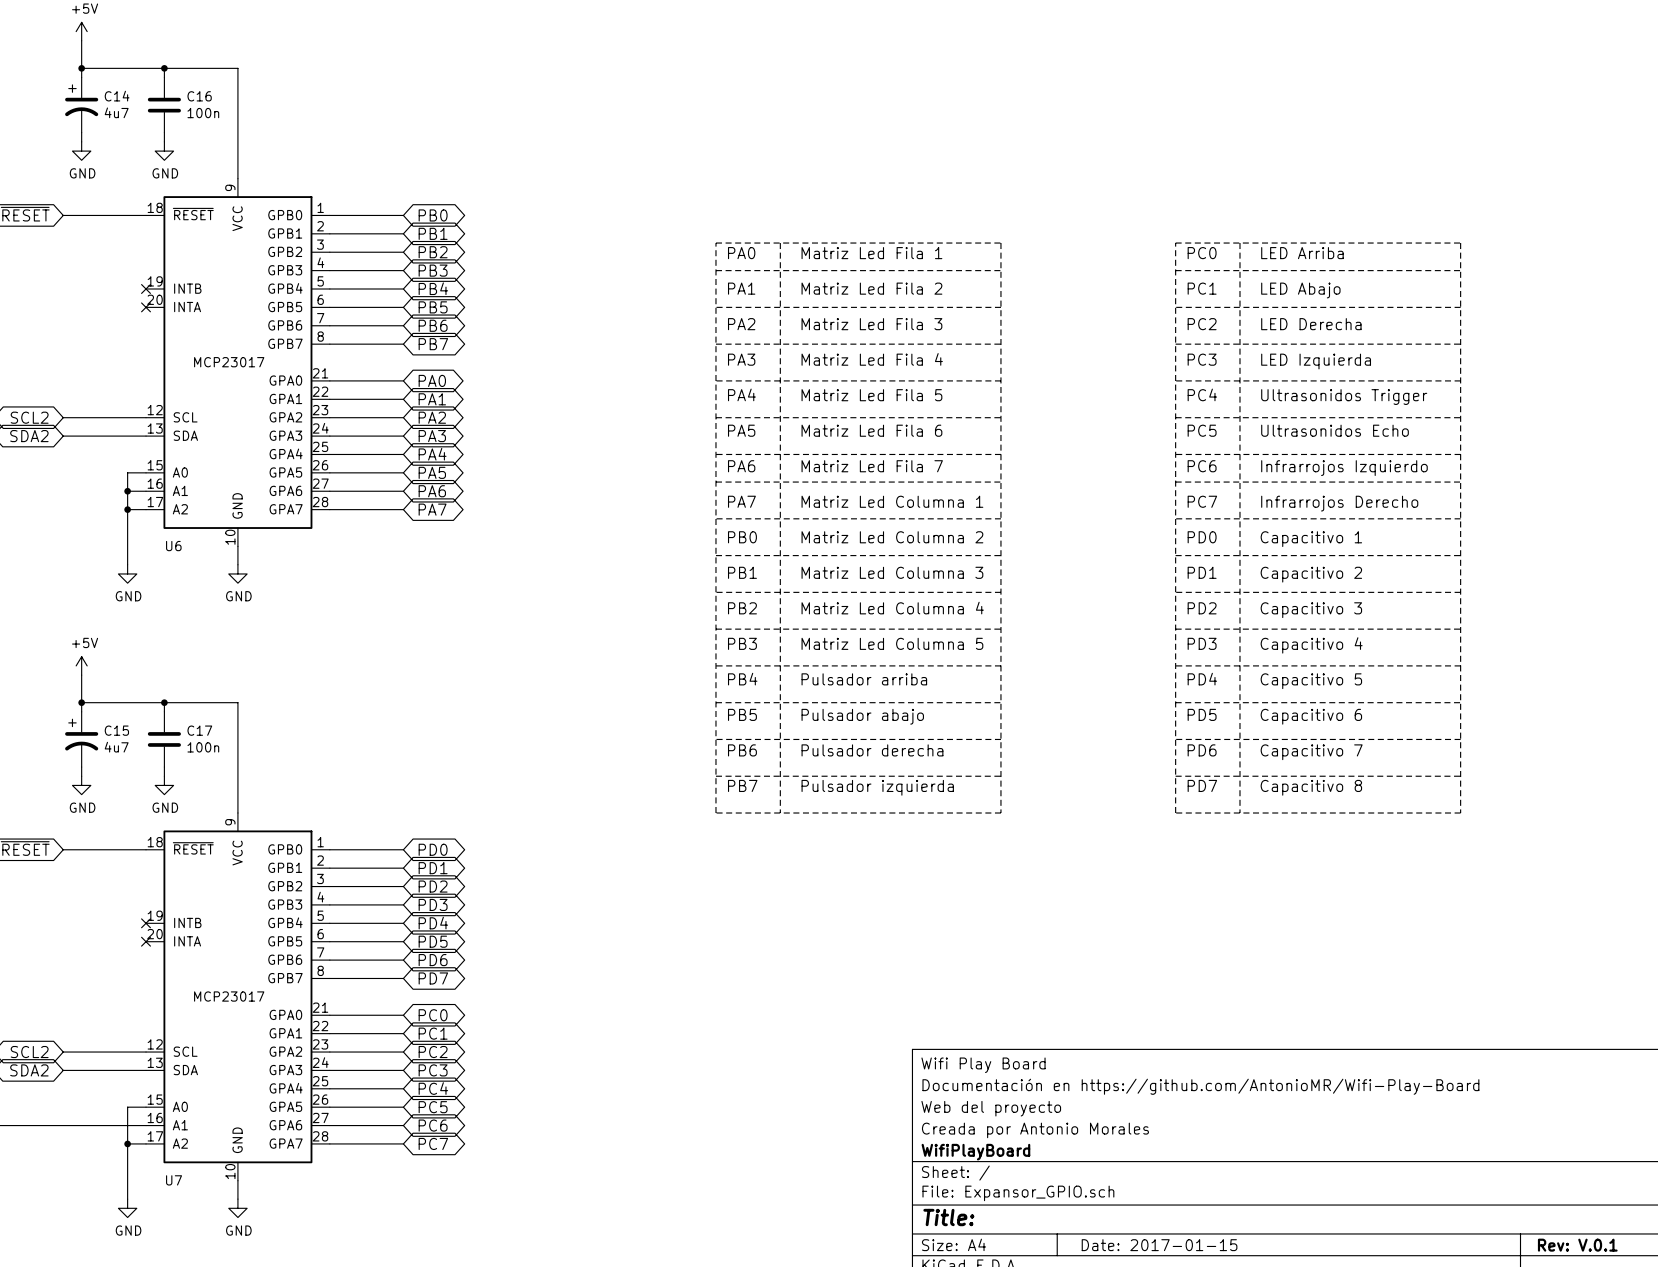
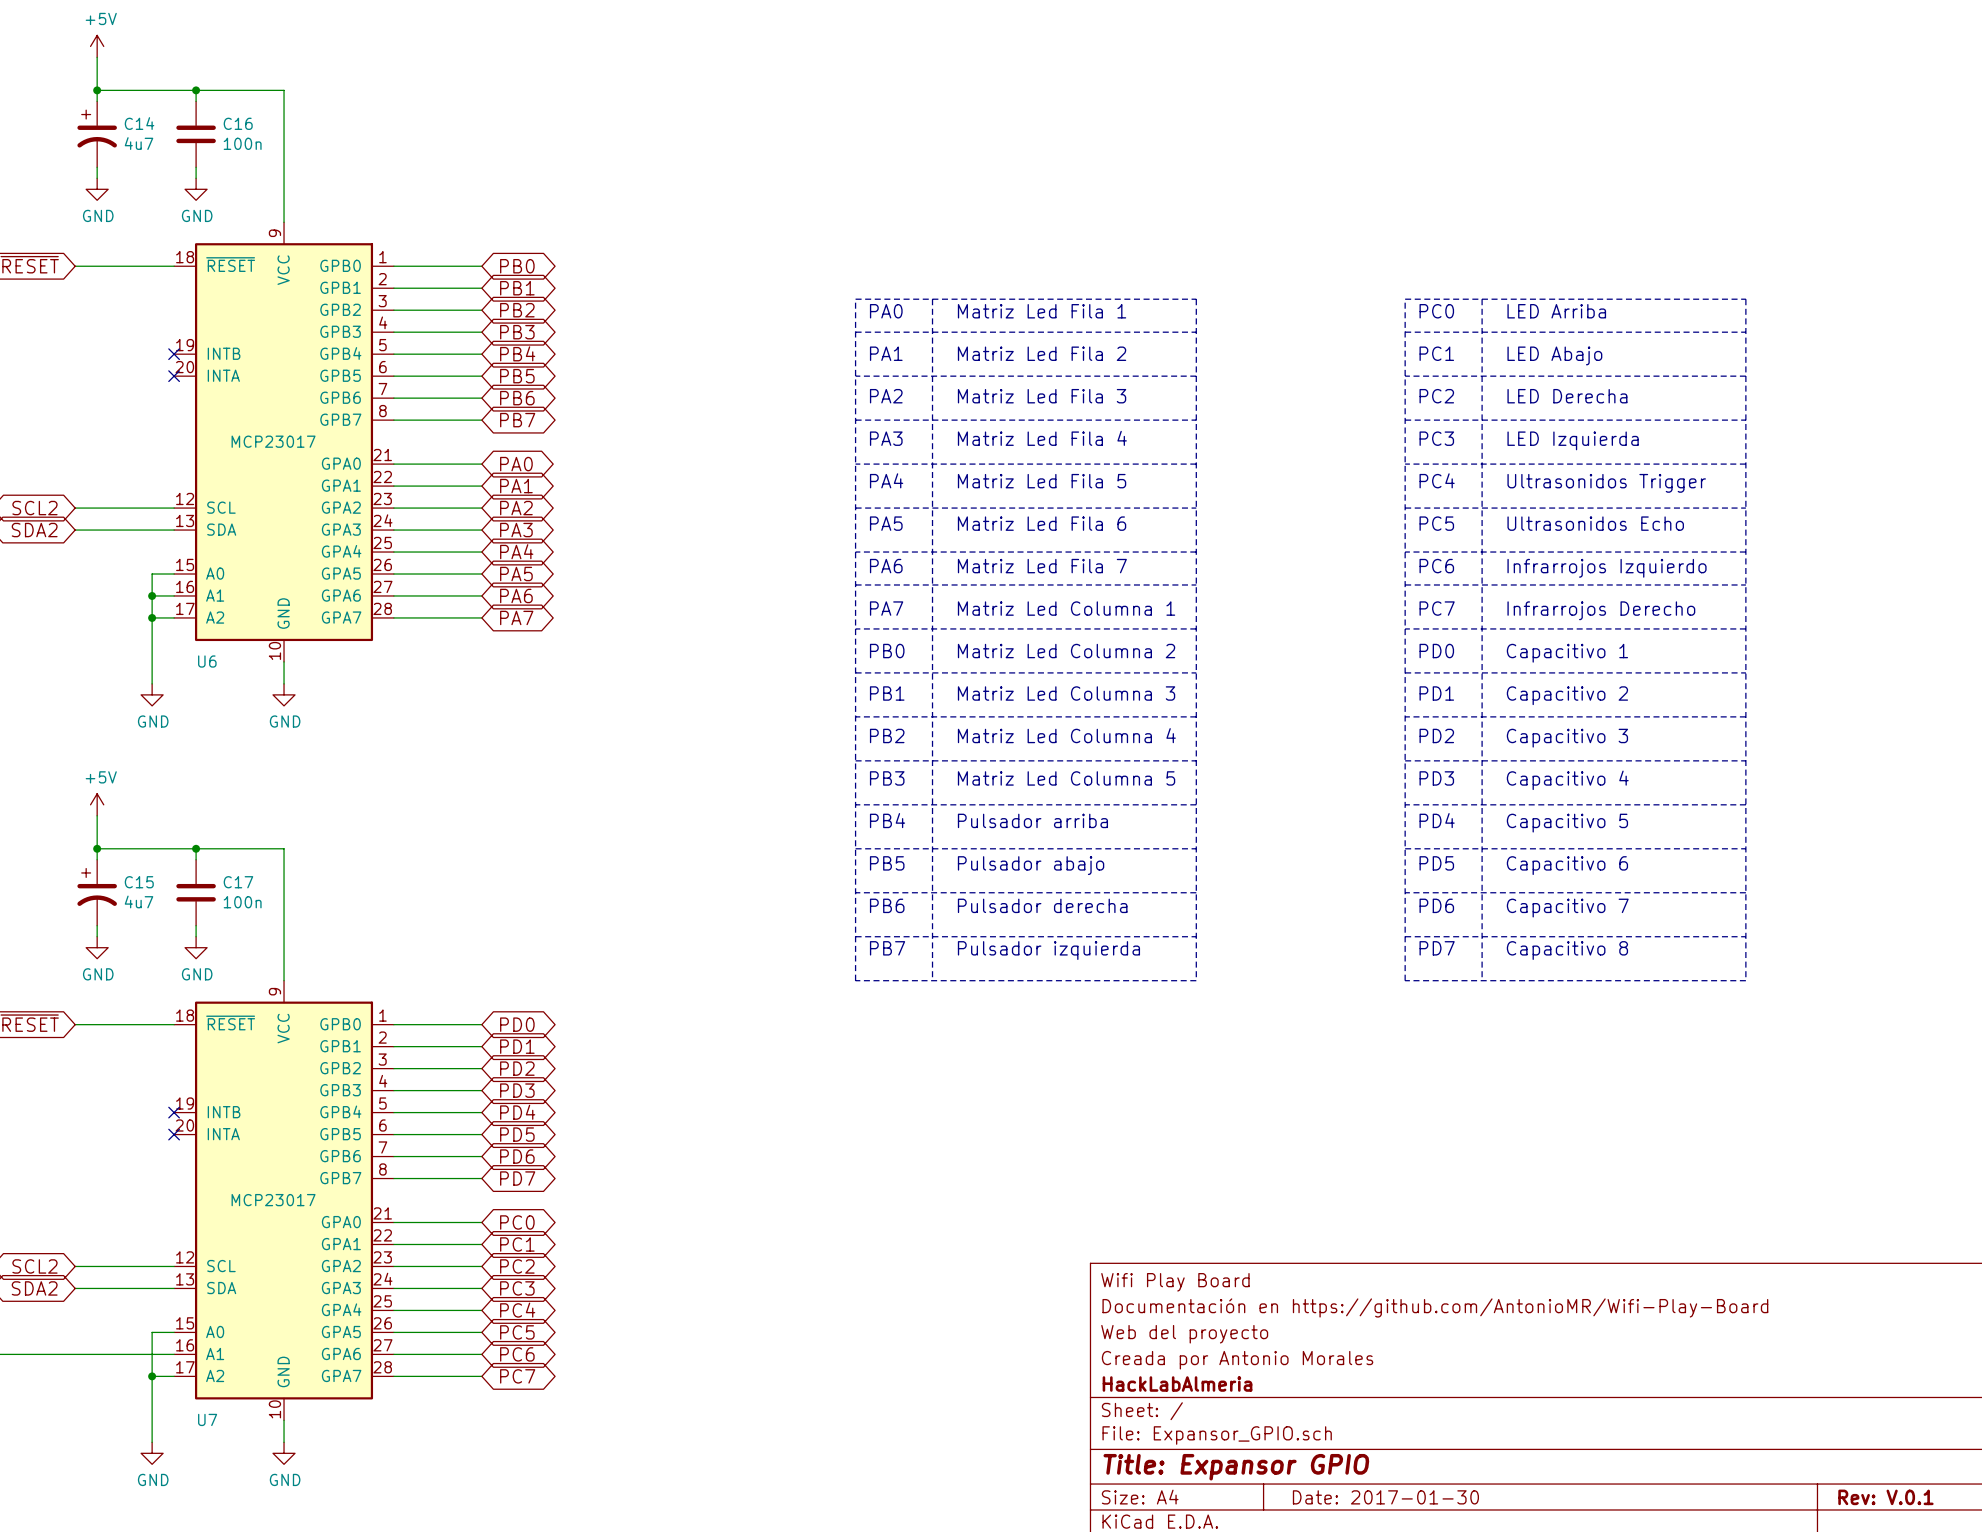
title block: WifiPlayBoard (975, 1152) -> HackLabAlmeria (1177, 1384)
title block: Title: (948, 1217) -> Title: Expansor GPIO (1236, 1467)
title block: Date: 2017-01-15 (1159, 1245) -> Date: 2017-01-30 (1385, 1497)

